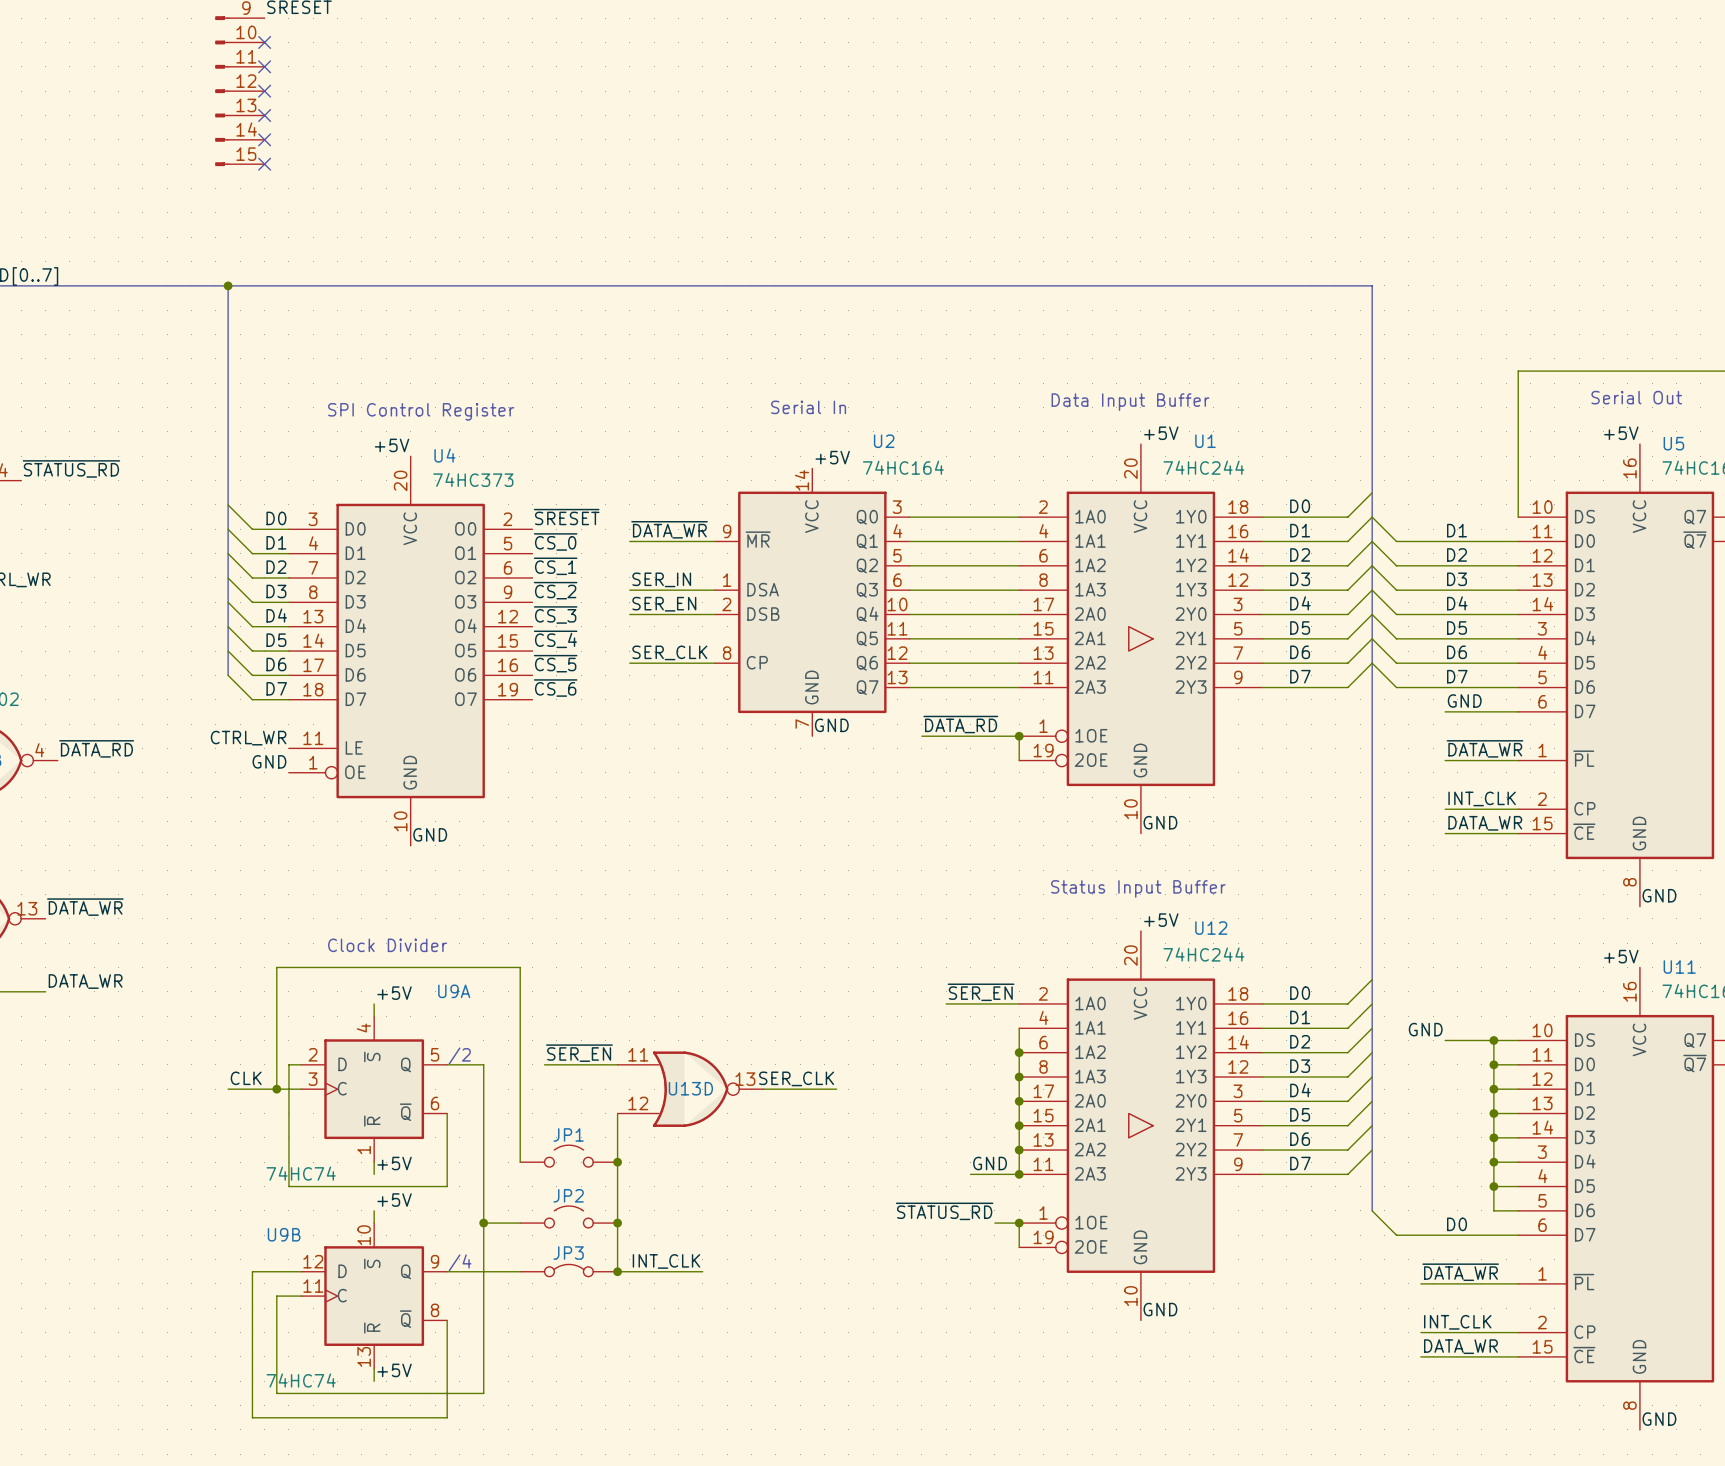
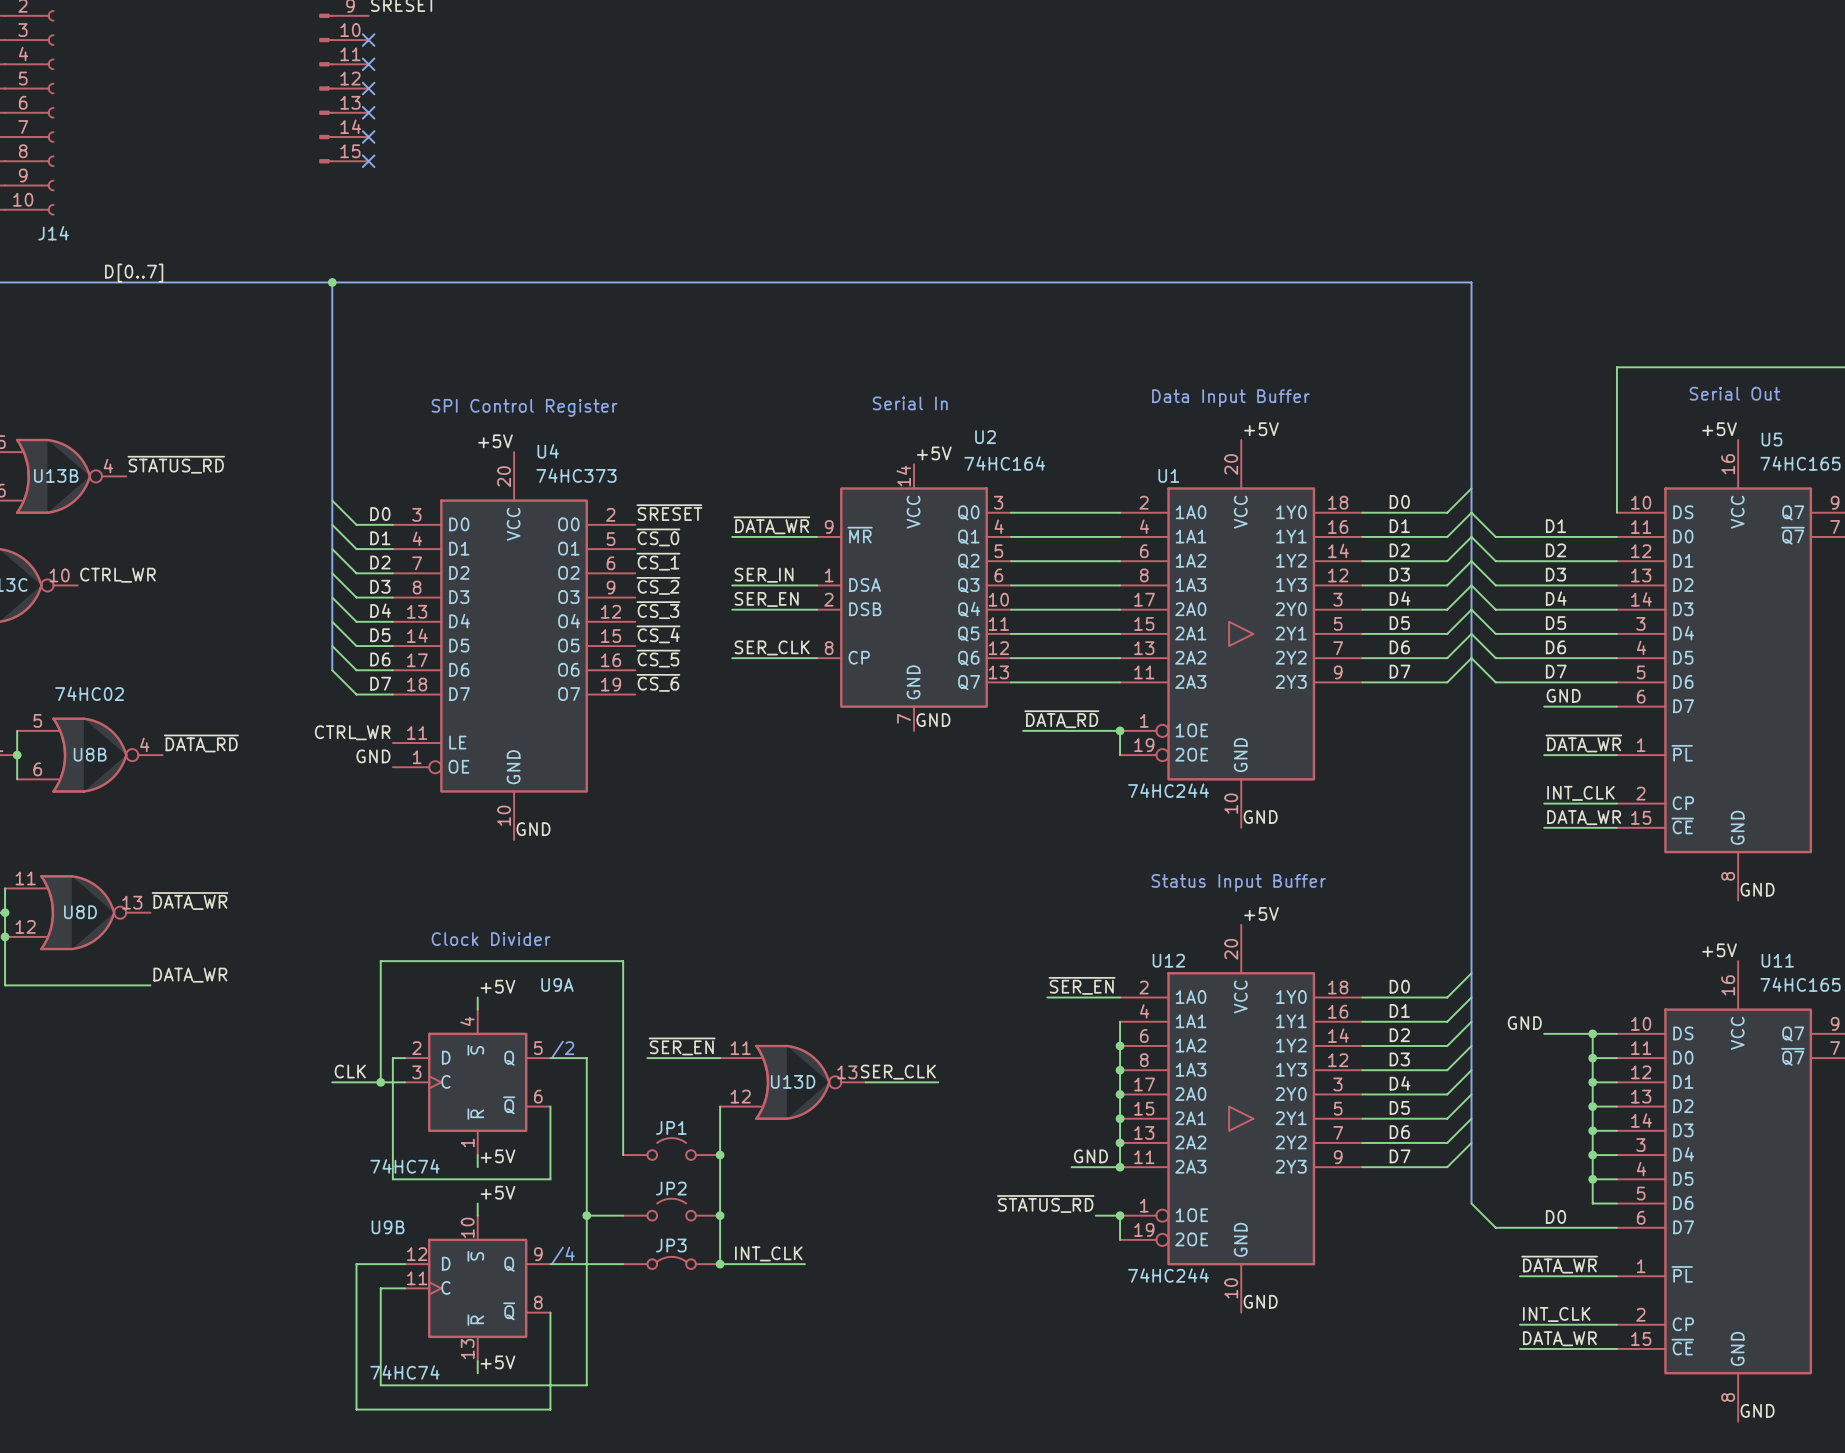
U1 name position: U1 (1205, 441) -> U1 (1168, 475)
U1 value position: 74HC244 (1203, 467) -> 74HC244 (1168, 790)
U12 name position: U12 (1211, 928) -> U12 (1168, 960)
U12 value position: 74HC244 (1203, 954) -> 74HC244 (1168, 1275)

